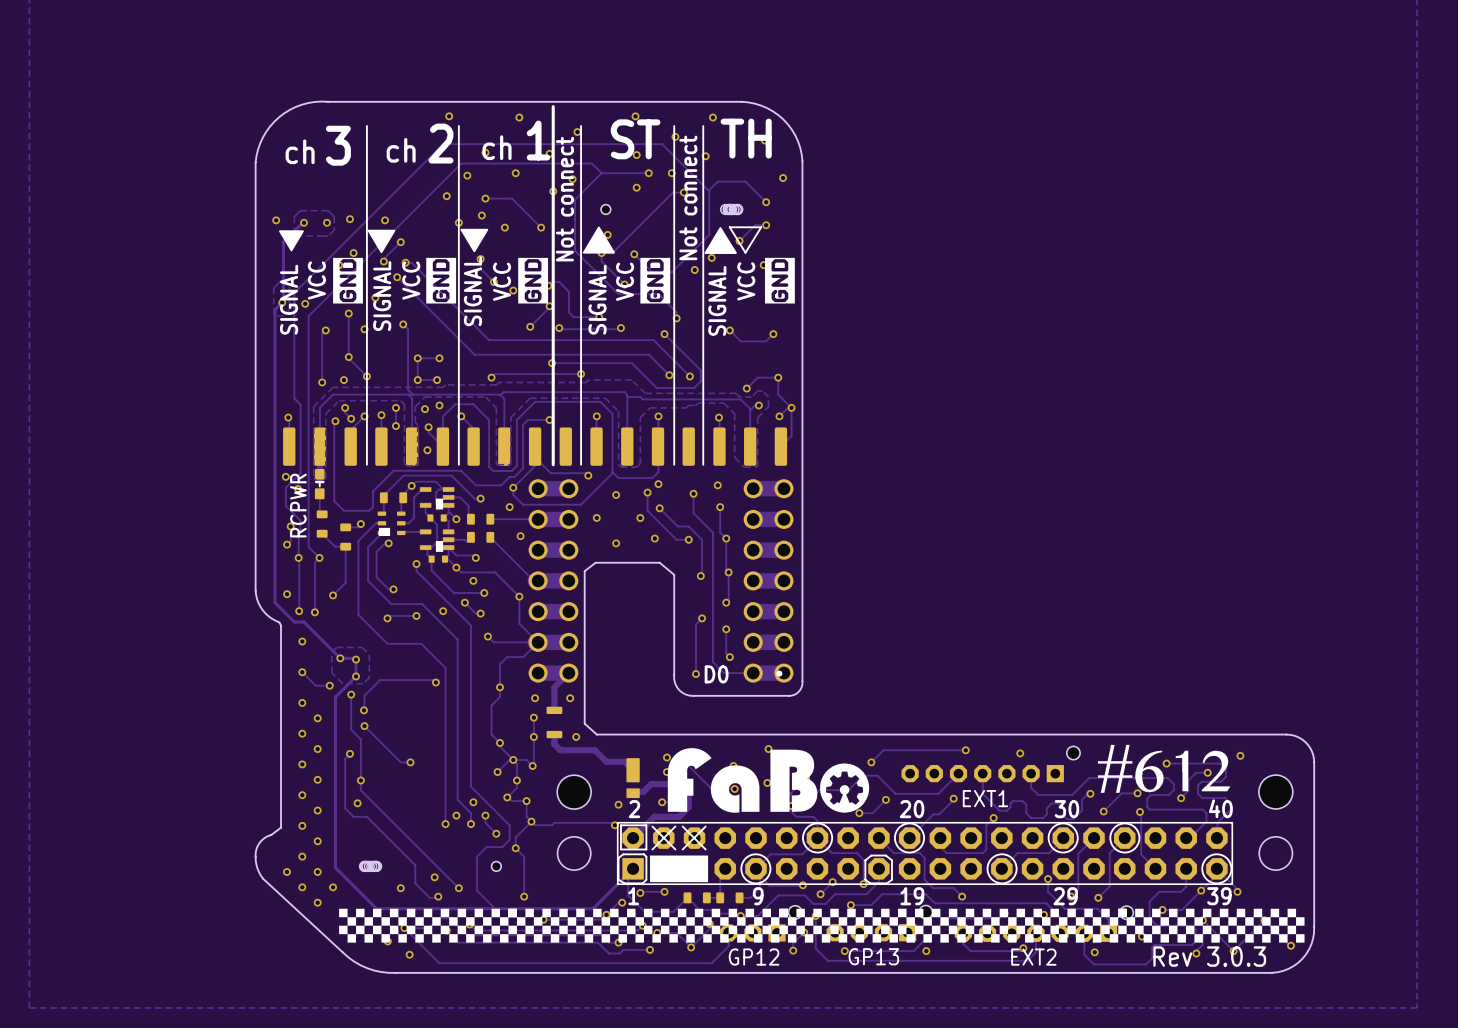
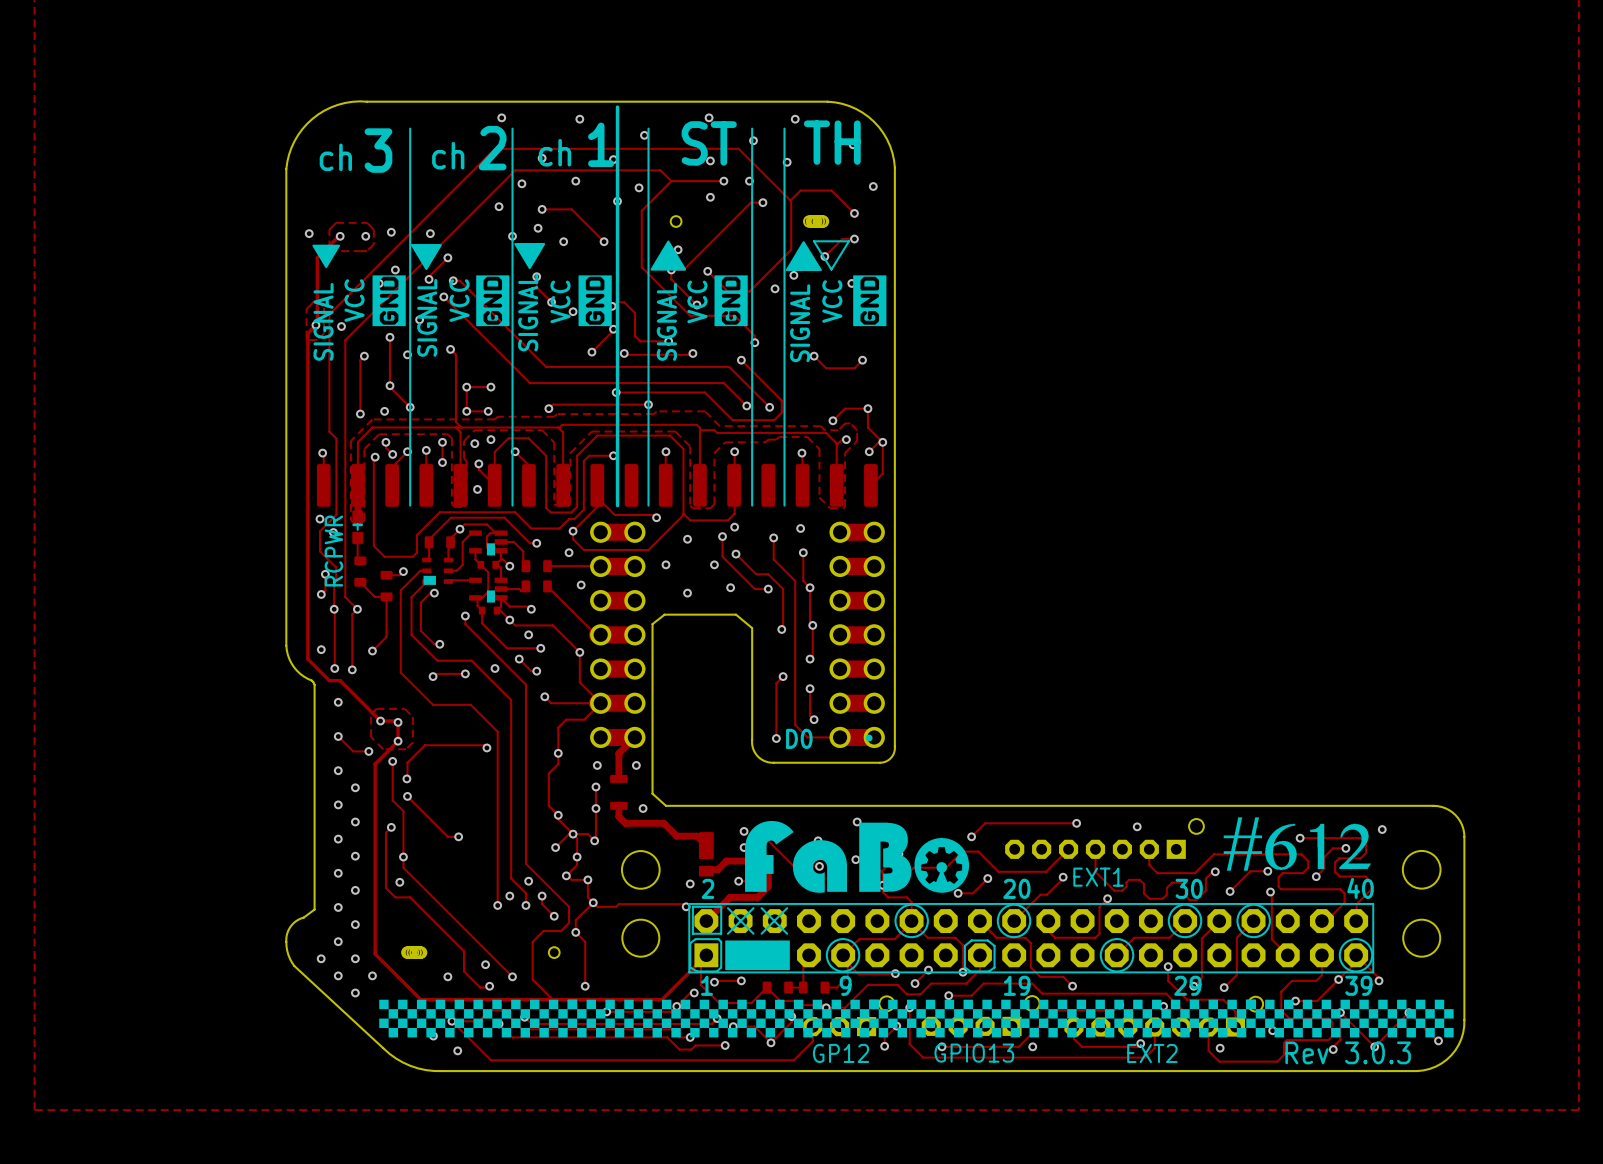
text: Not connect (688, 197) -> none
text: Not connect (564, 199) -> none
GP13 name: GP13 (873, 956) -> GPIO13 (974, 1053)

